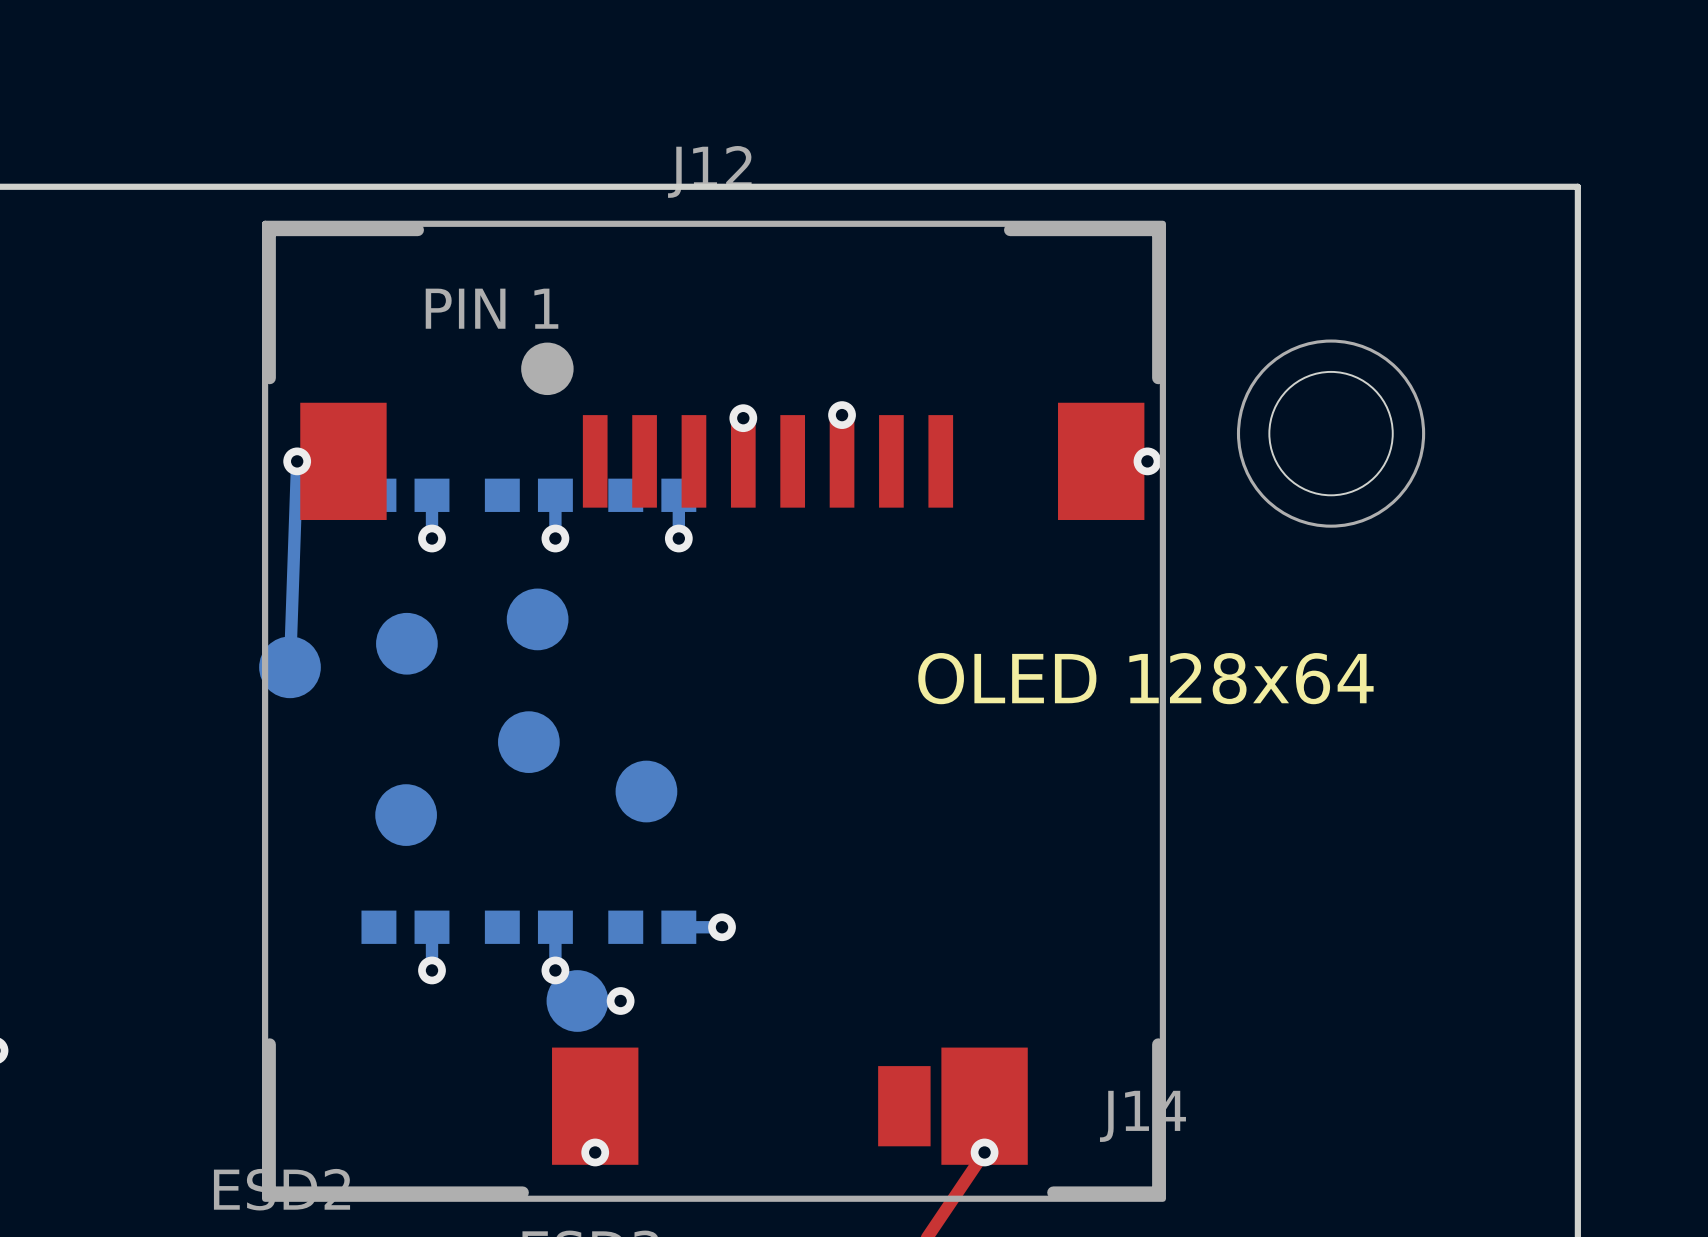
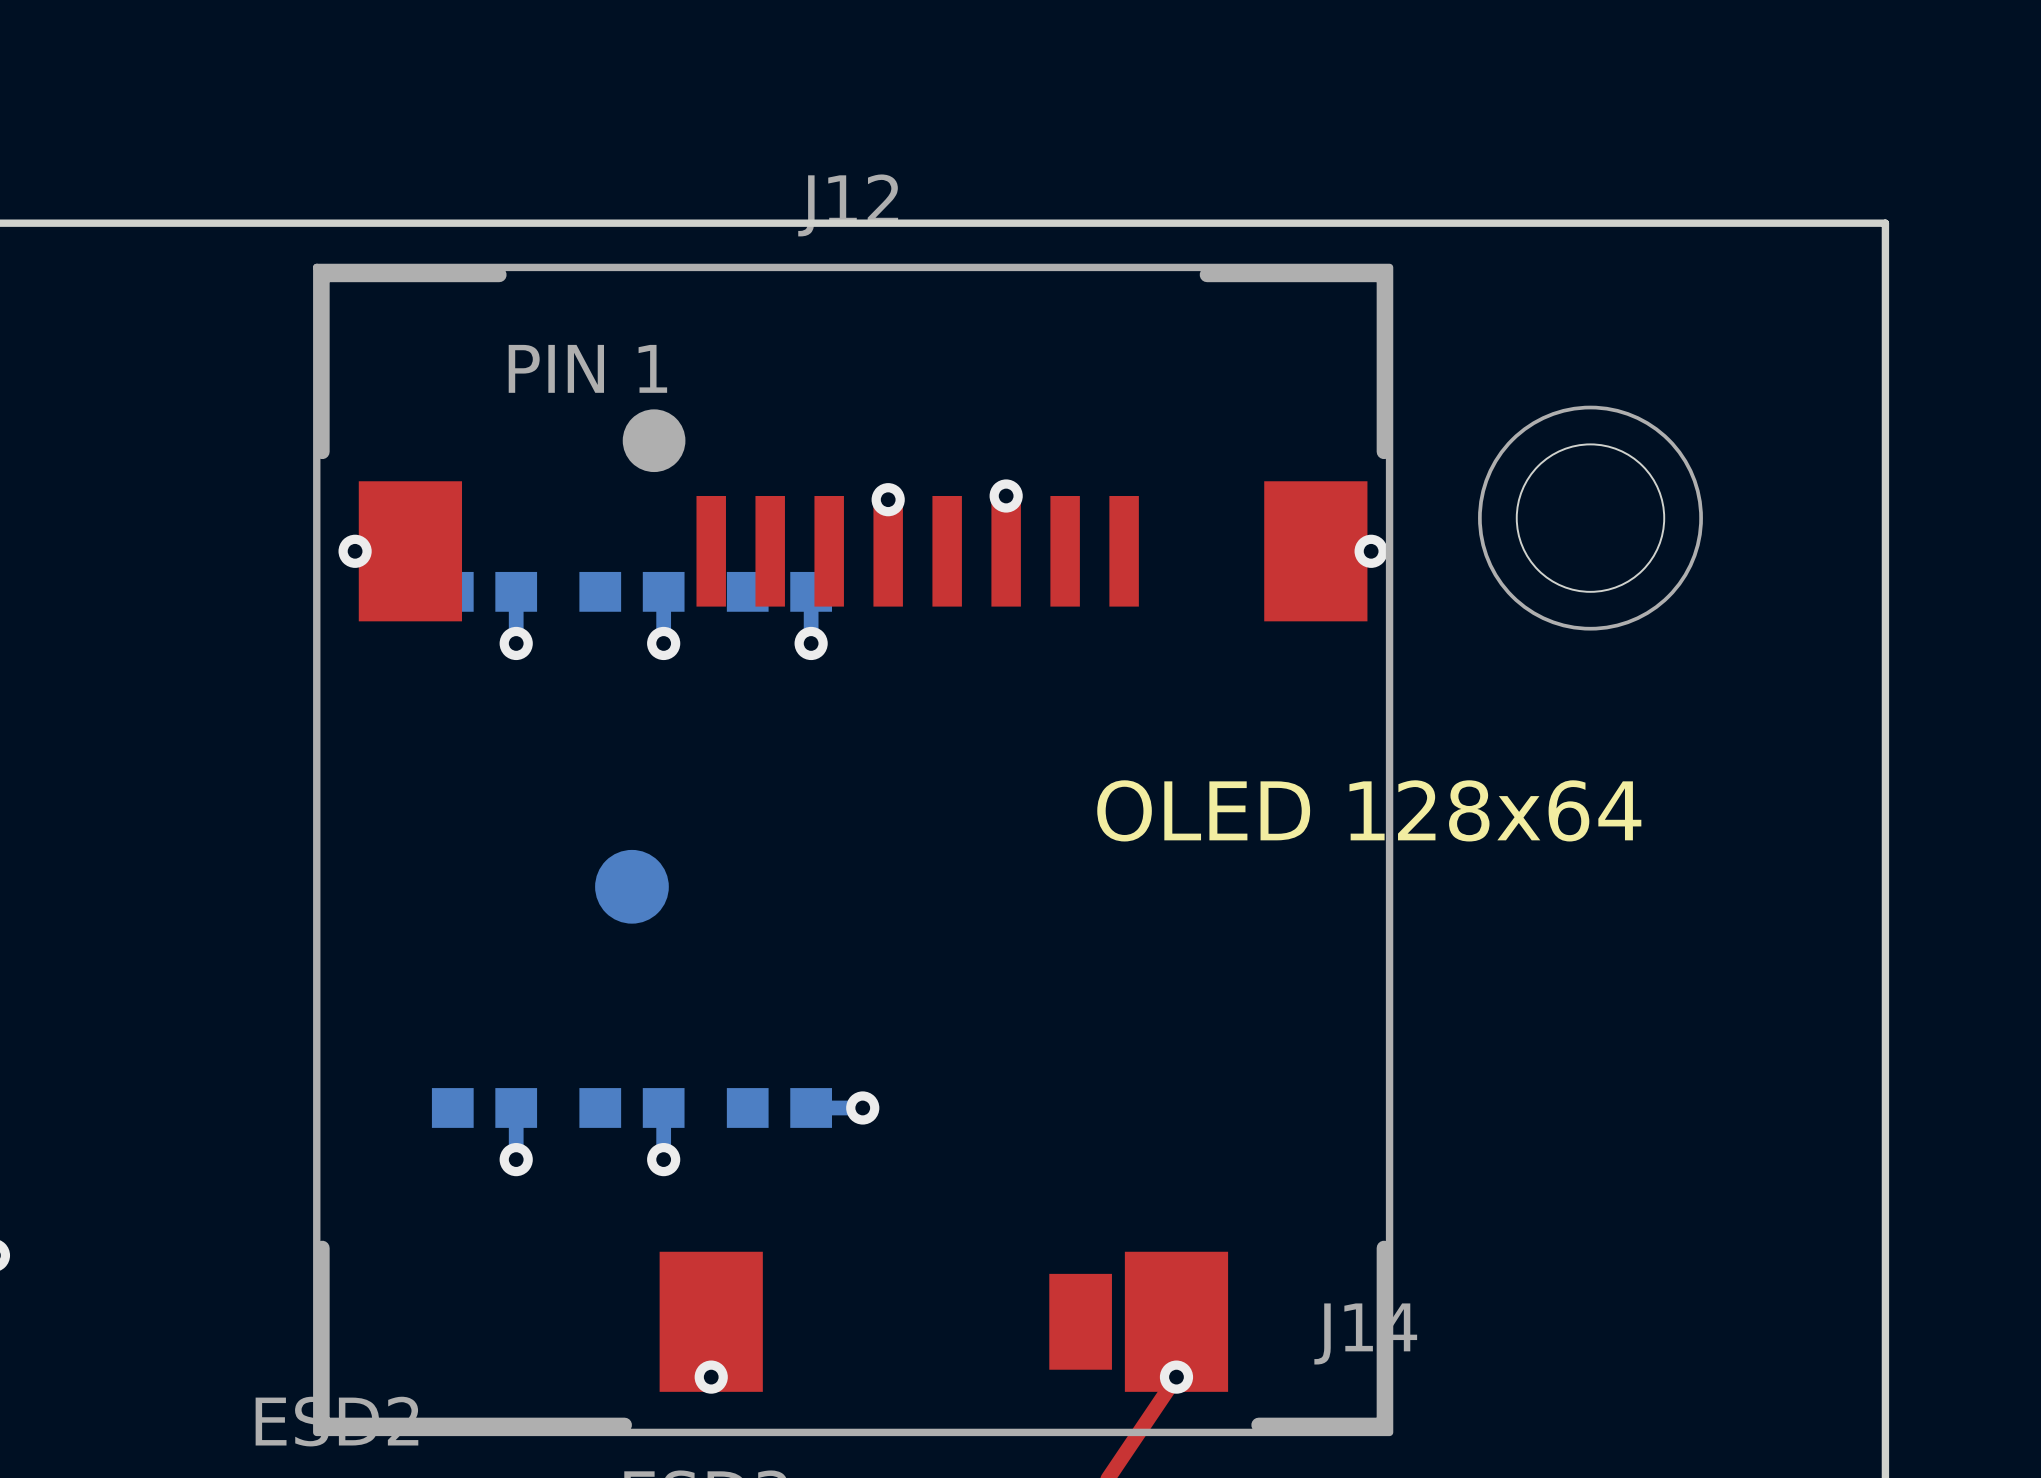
bottom track: (297, 461) (290, 667) -> none
part: (537, 619) -> none
part: (406, 643) -> none
part: (290, 667) -> none
part: (646, 791) -> none
part: (406, 815) -> none
part: (577, 1000) -> none
via: (620, 1000) -> none

